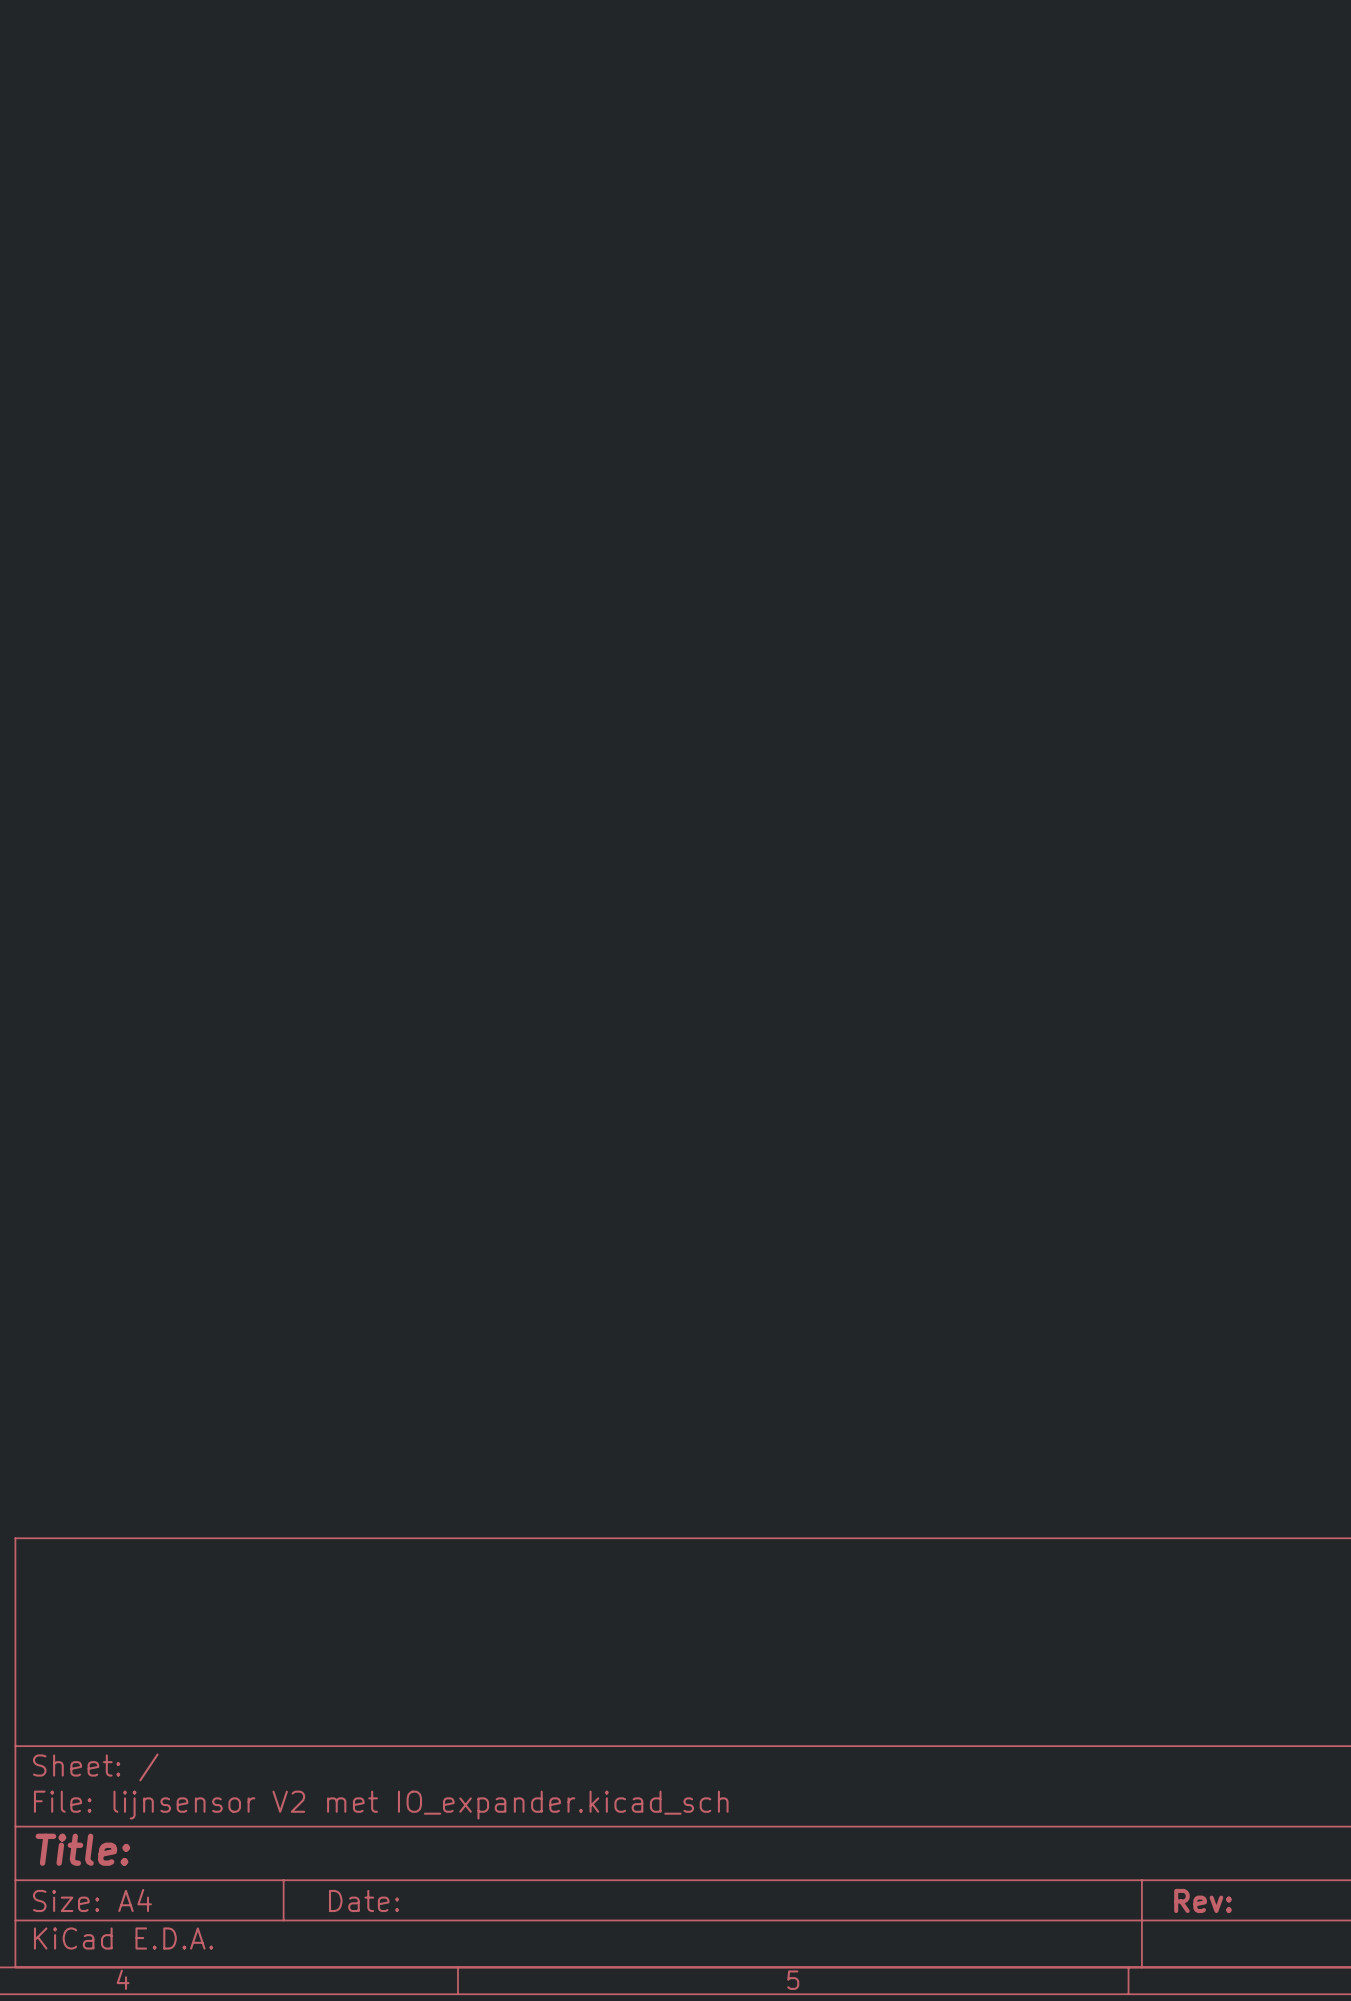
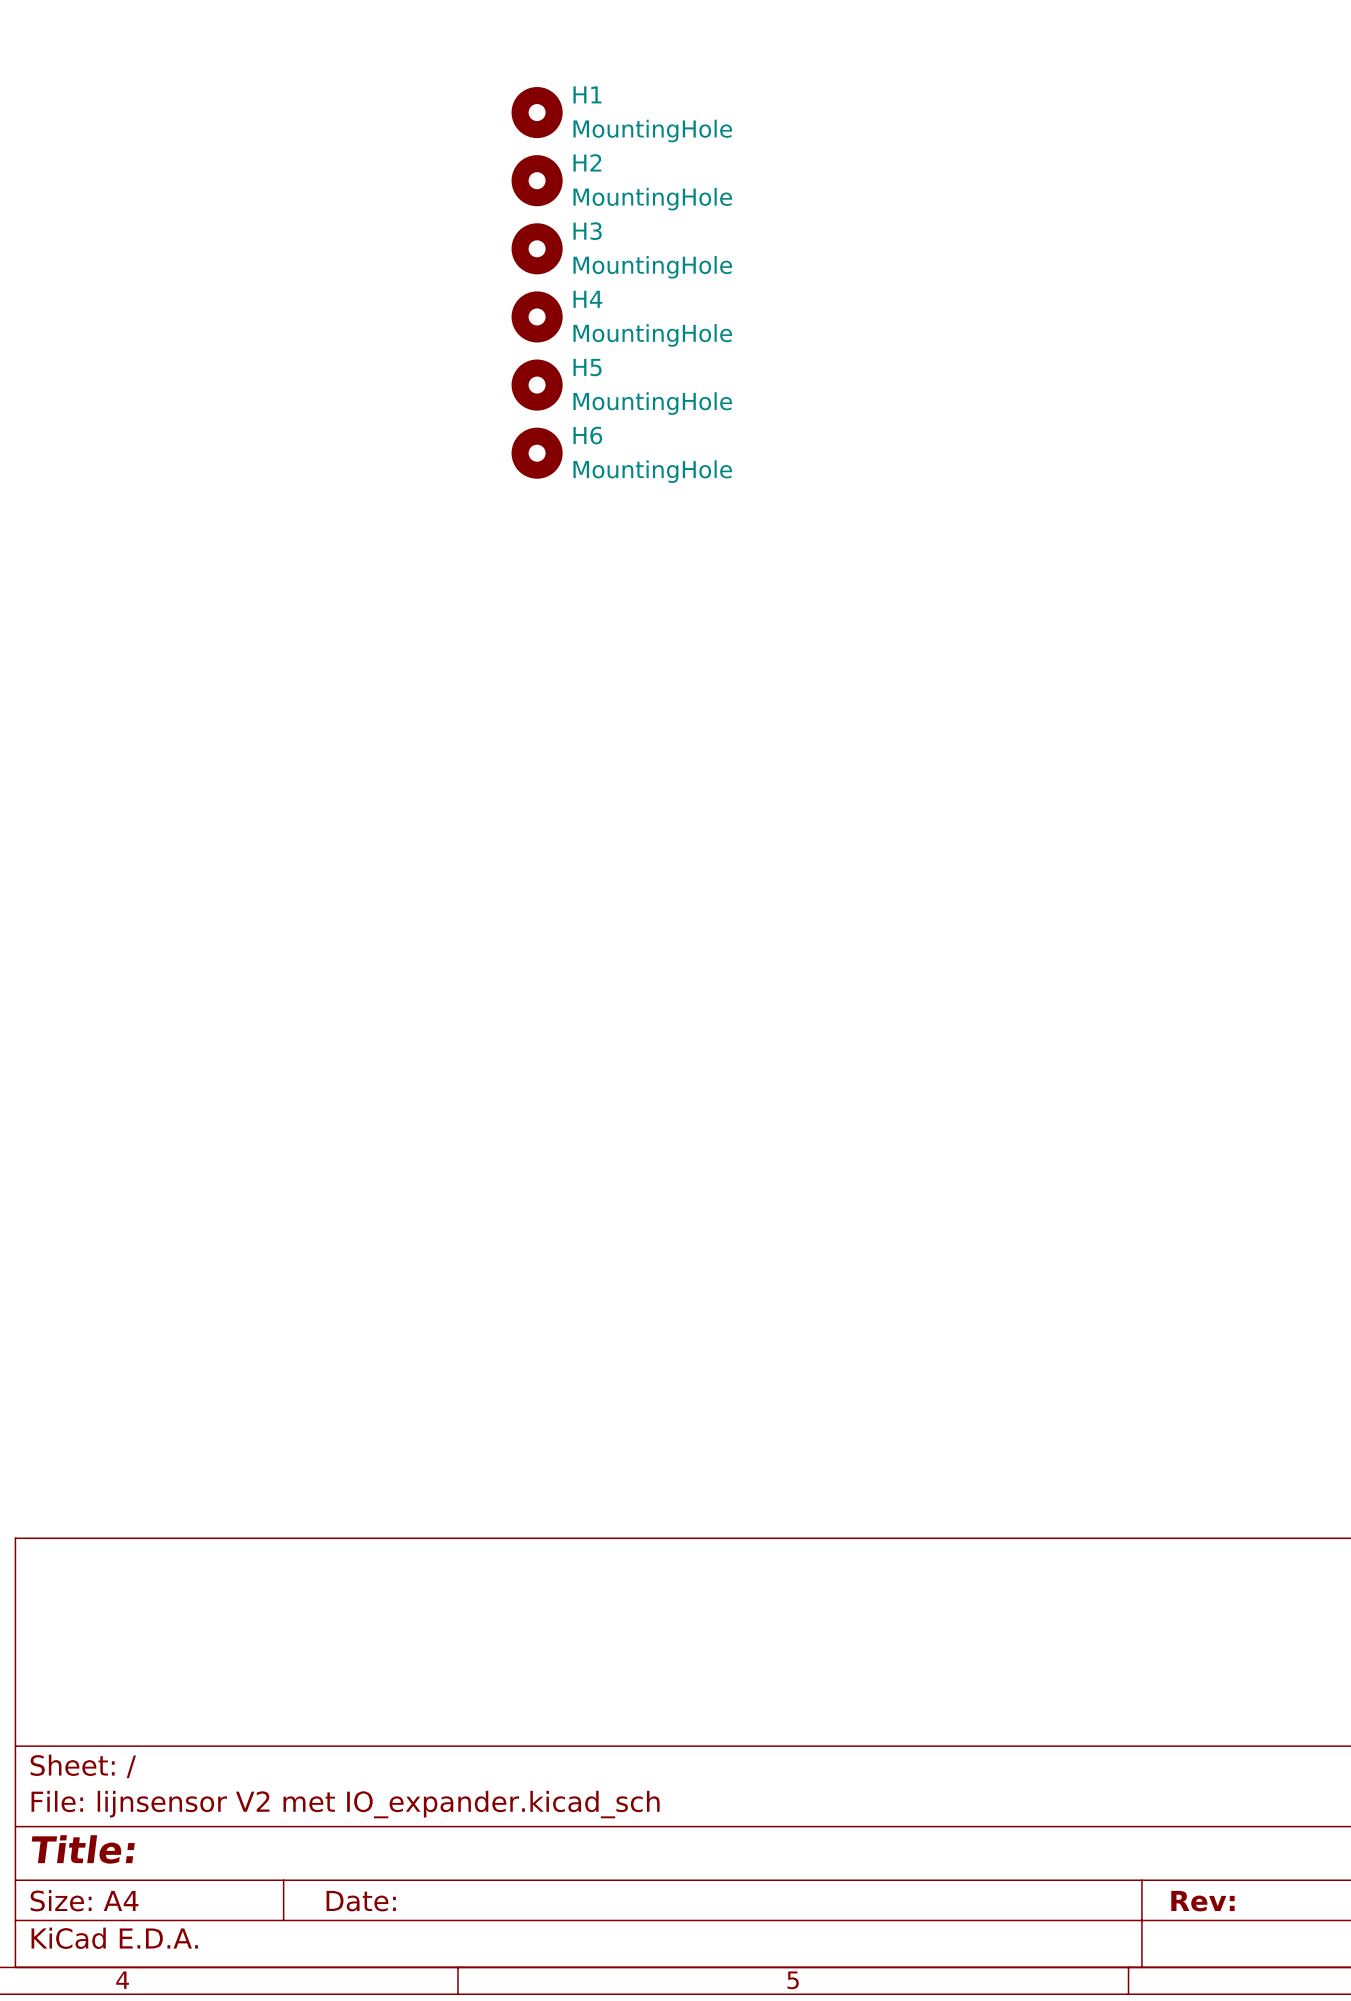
H1: none -> MountingHole (537, 112)
H2: none -> MountingHole (537, 180)
H3: none -> MountingHole (537, 248)
H4: none -> MountingHole (537, 316)
H5: none -> MountingHole (537, 385)
H6: none -> MountingHole (537, 453)

